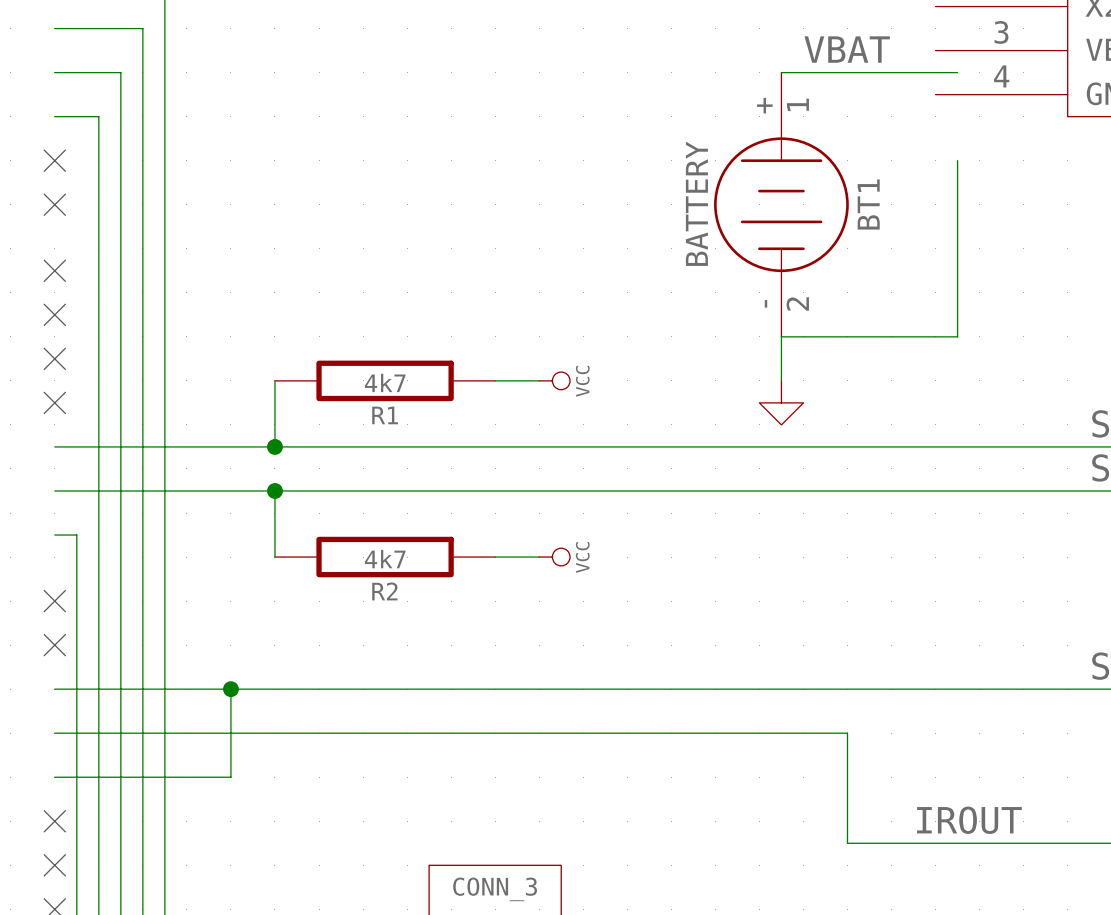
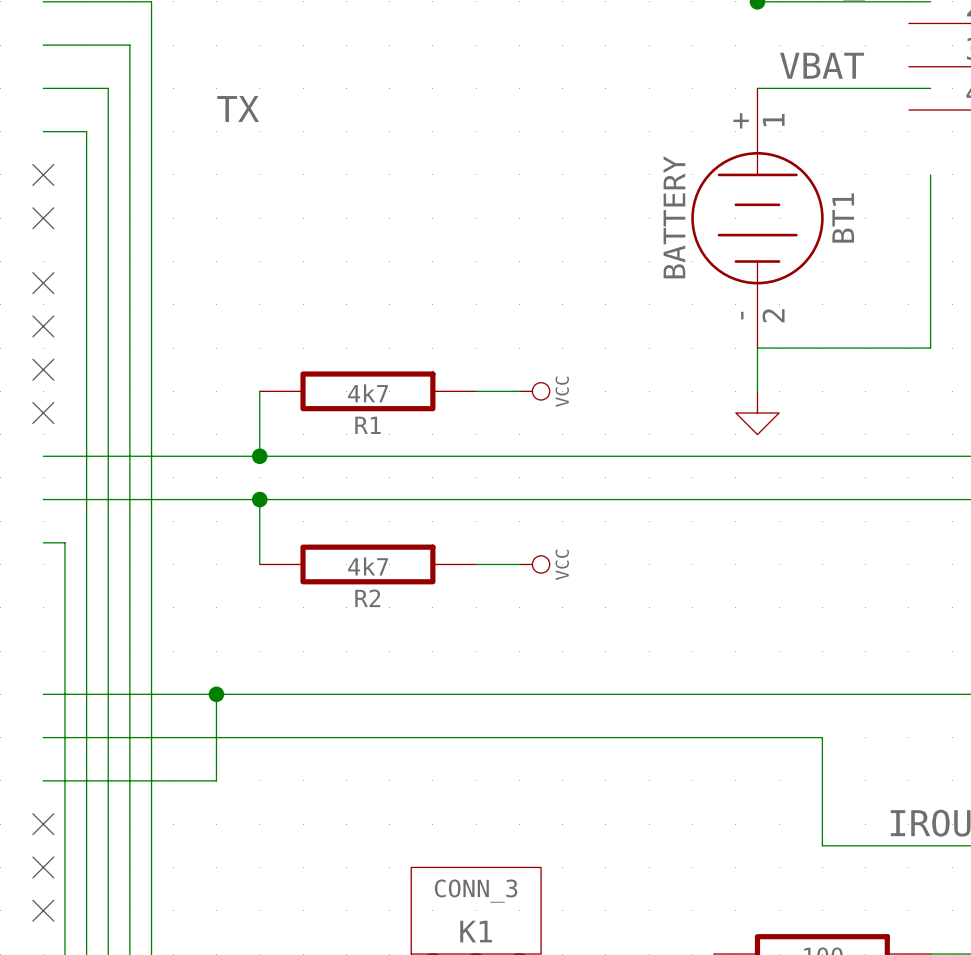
label: none -> TX (238, 109)
no-connect mark: (54, 601) -> none
no-connect mark: (54, 645) -> none

